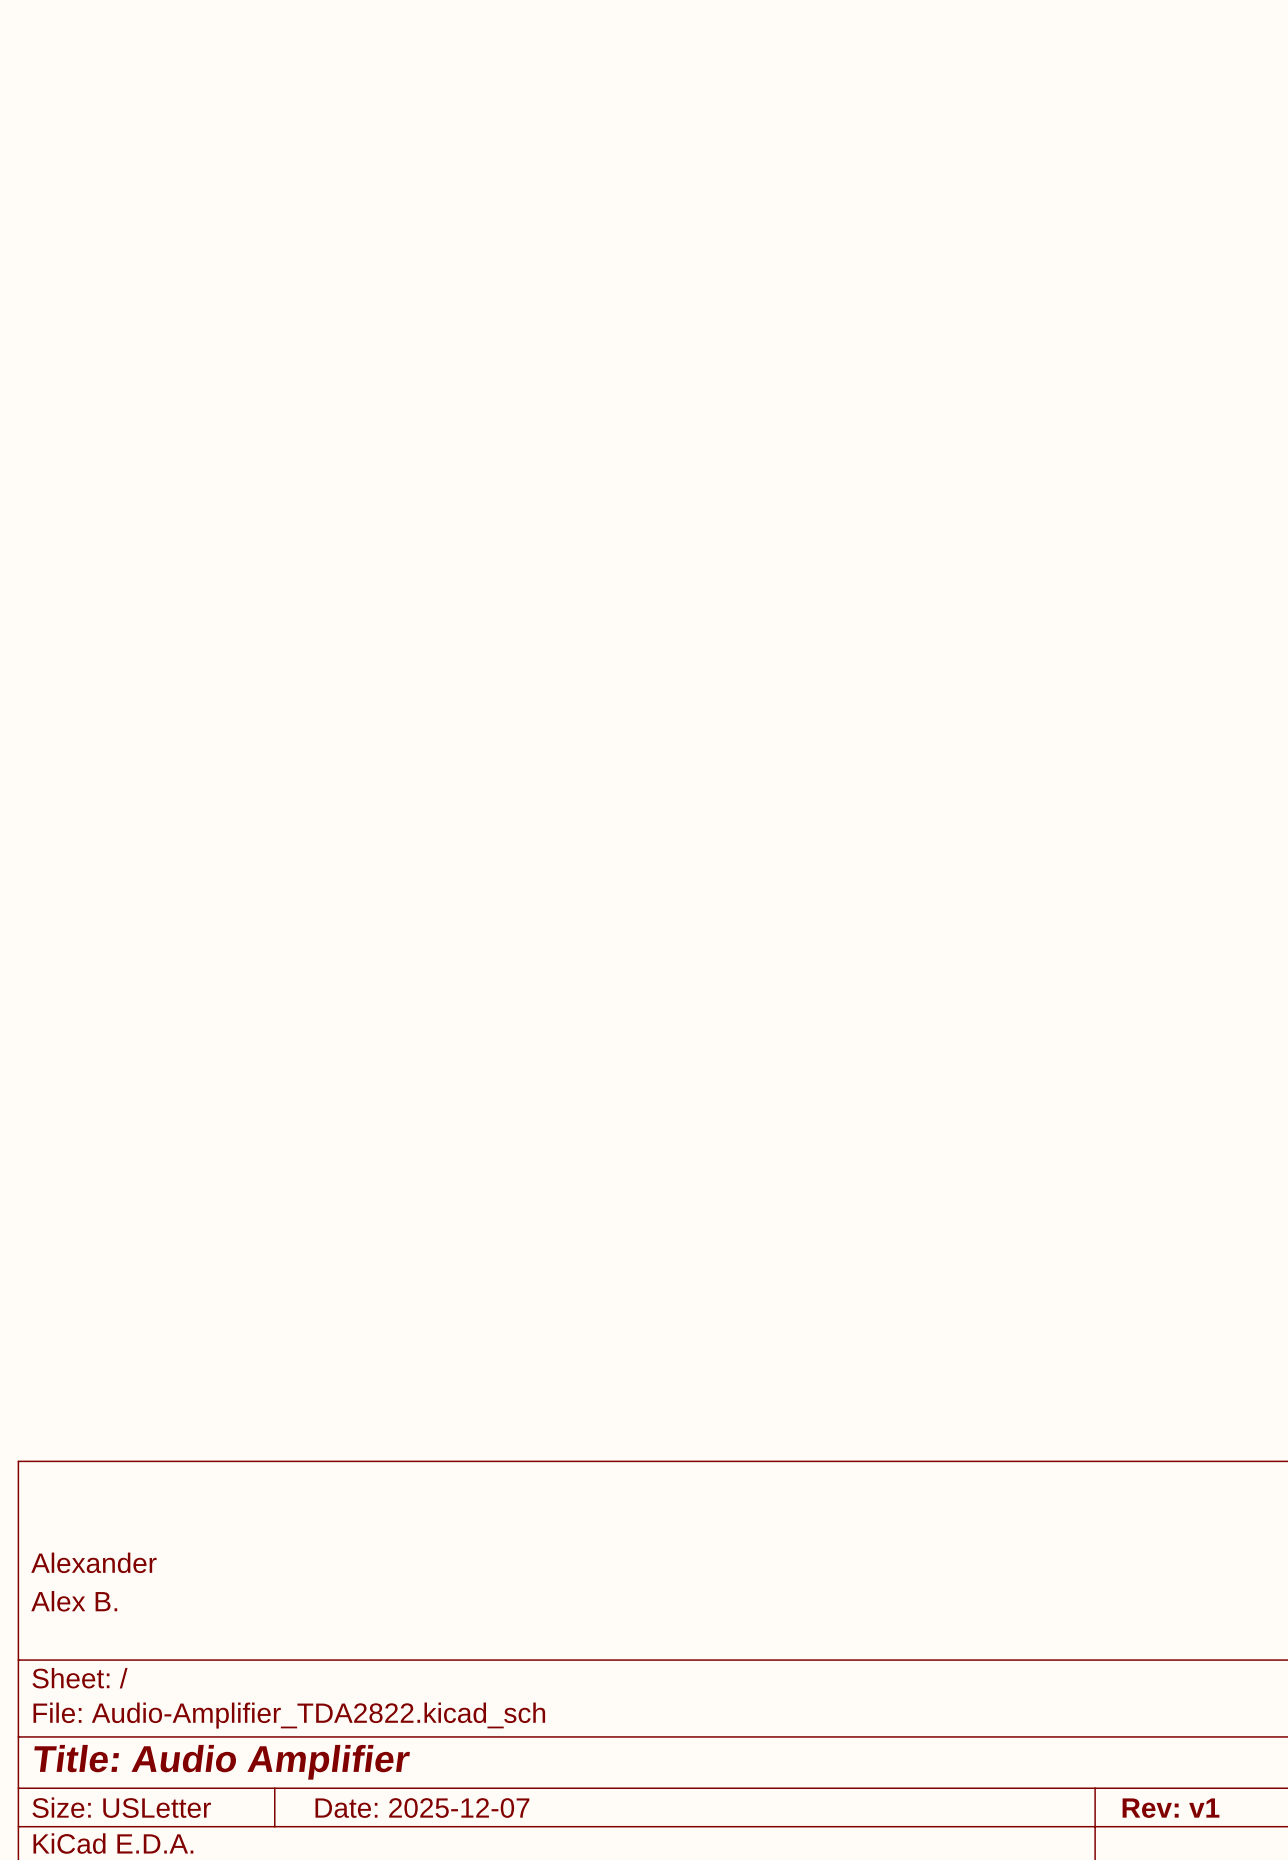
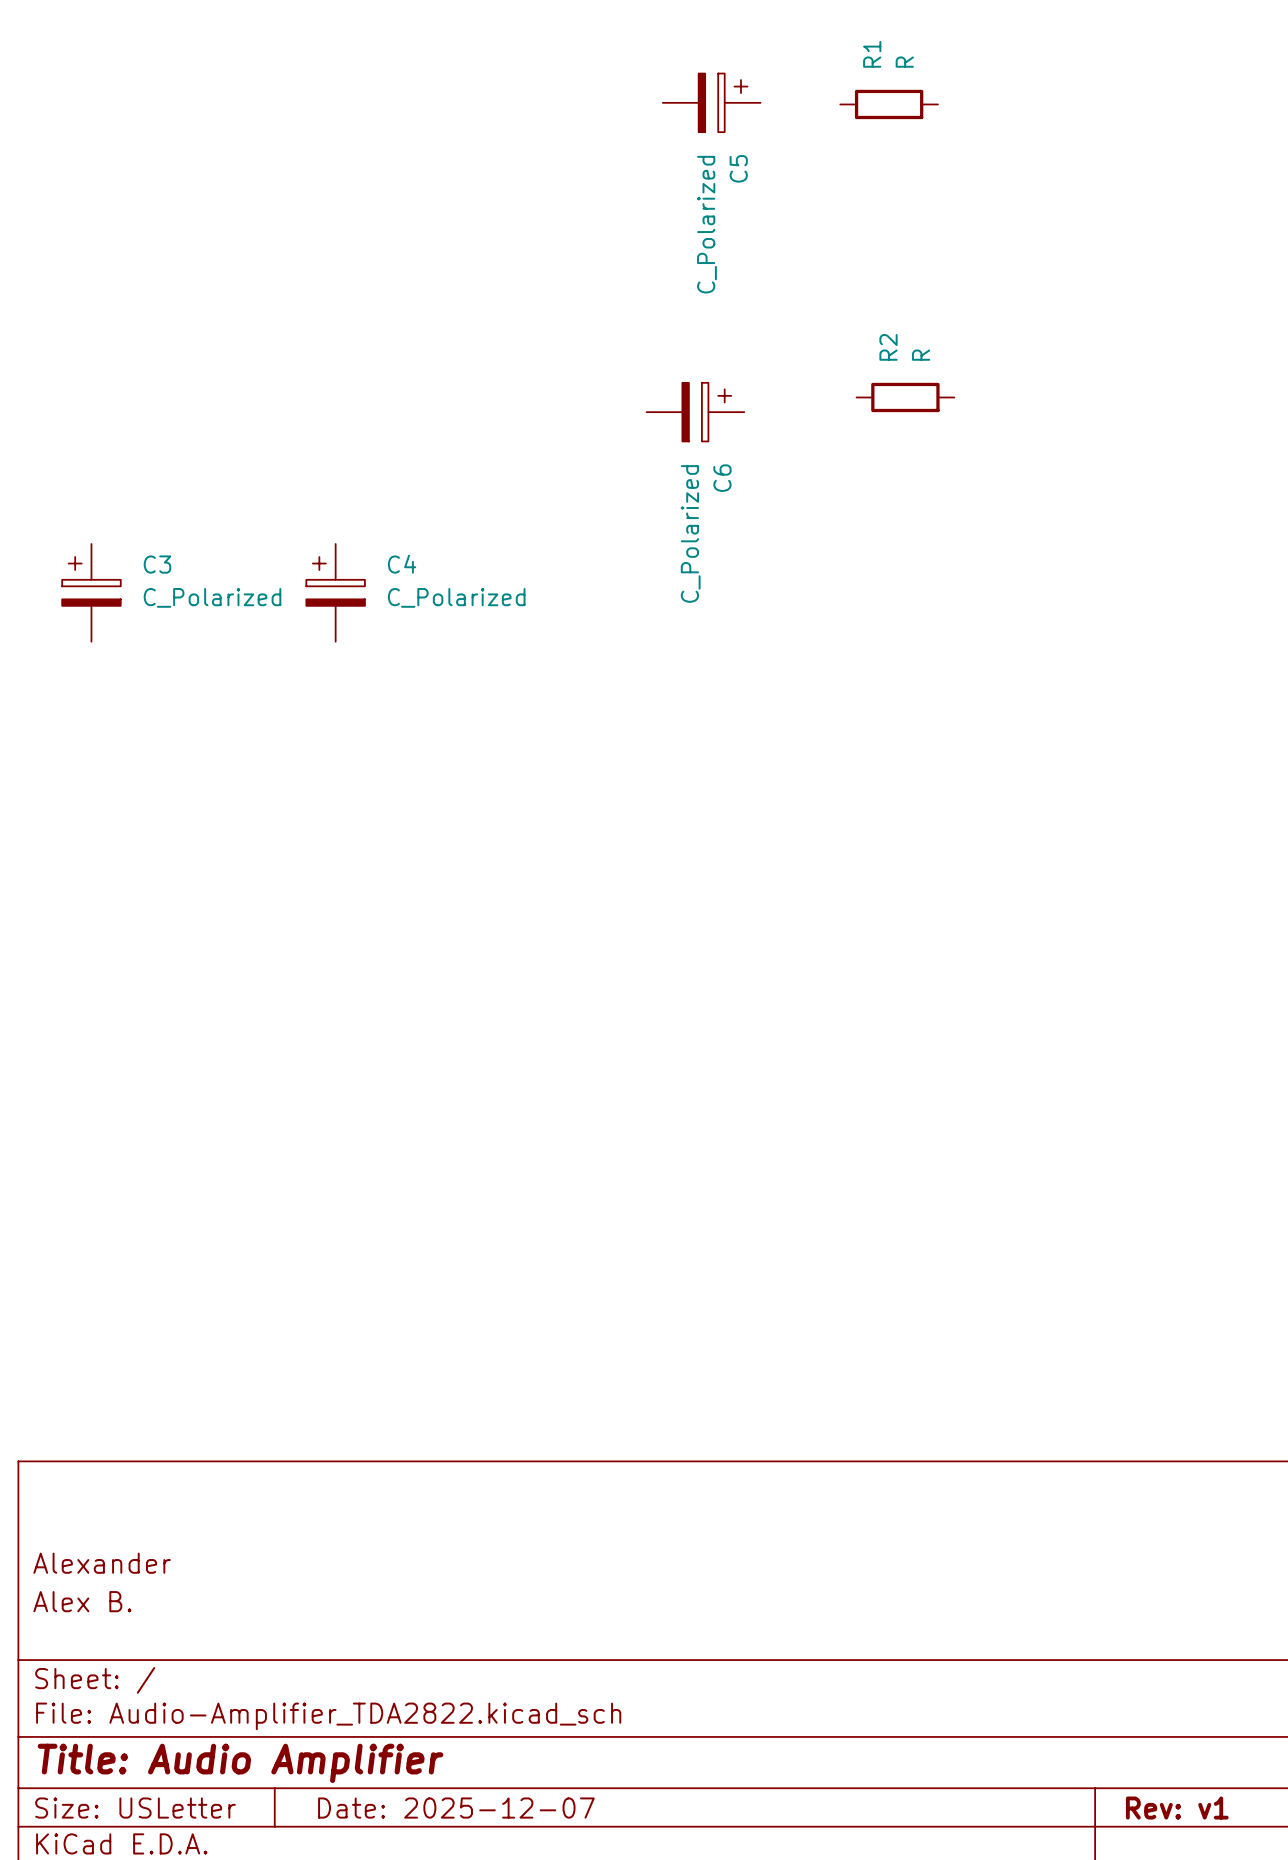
C5: none -> C_Polarized (711, 102)
R1: none -> R (889, 104)
R2: none -> R (905, 397)
C6: none -> C_Polarized (695, 412)
C3: none -> C_Polarized (91, 592)
C4: none -> C_Polarized (335, 592)

